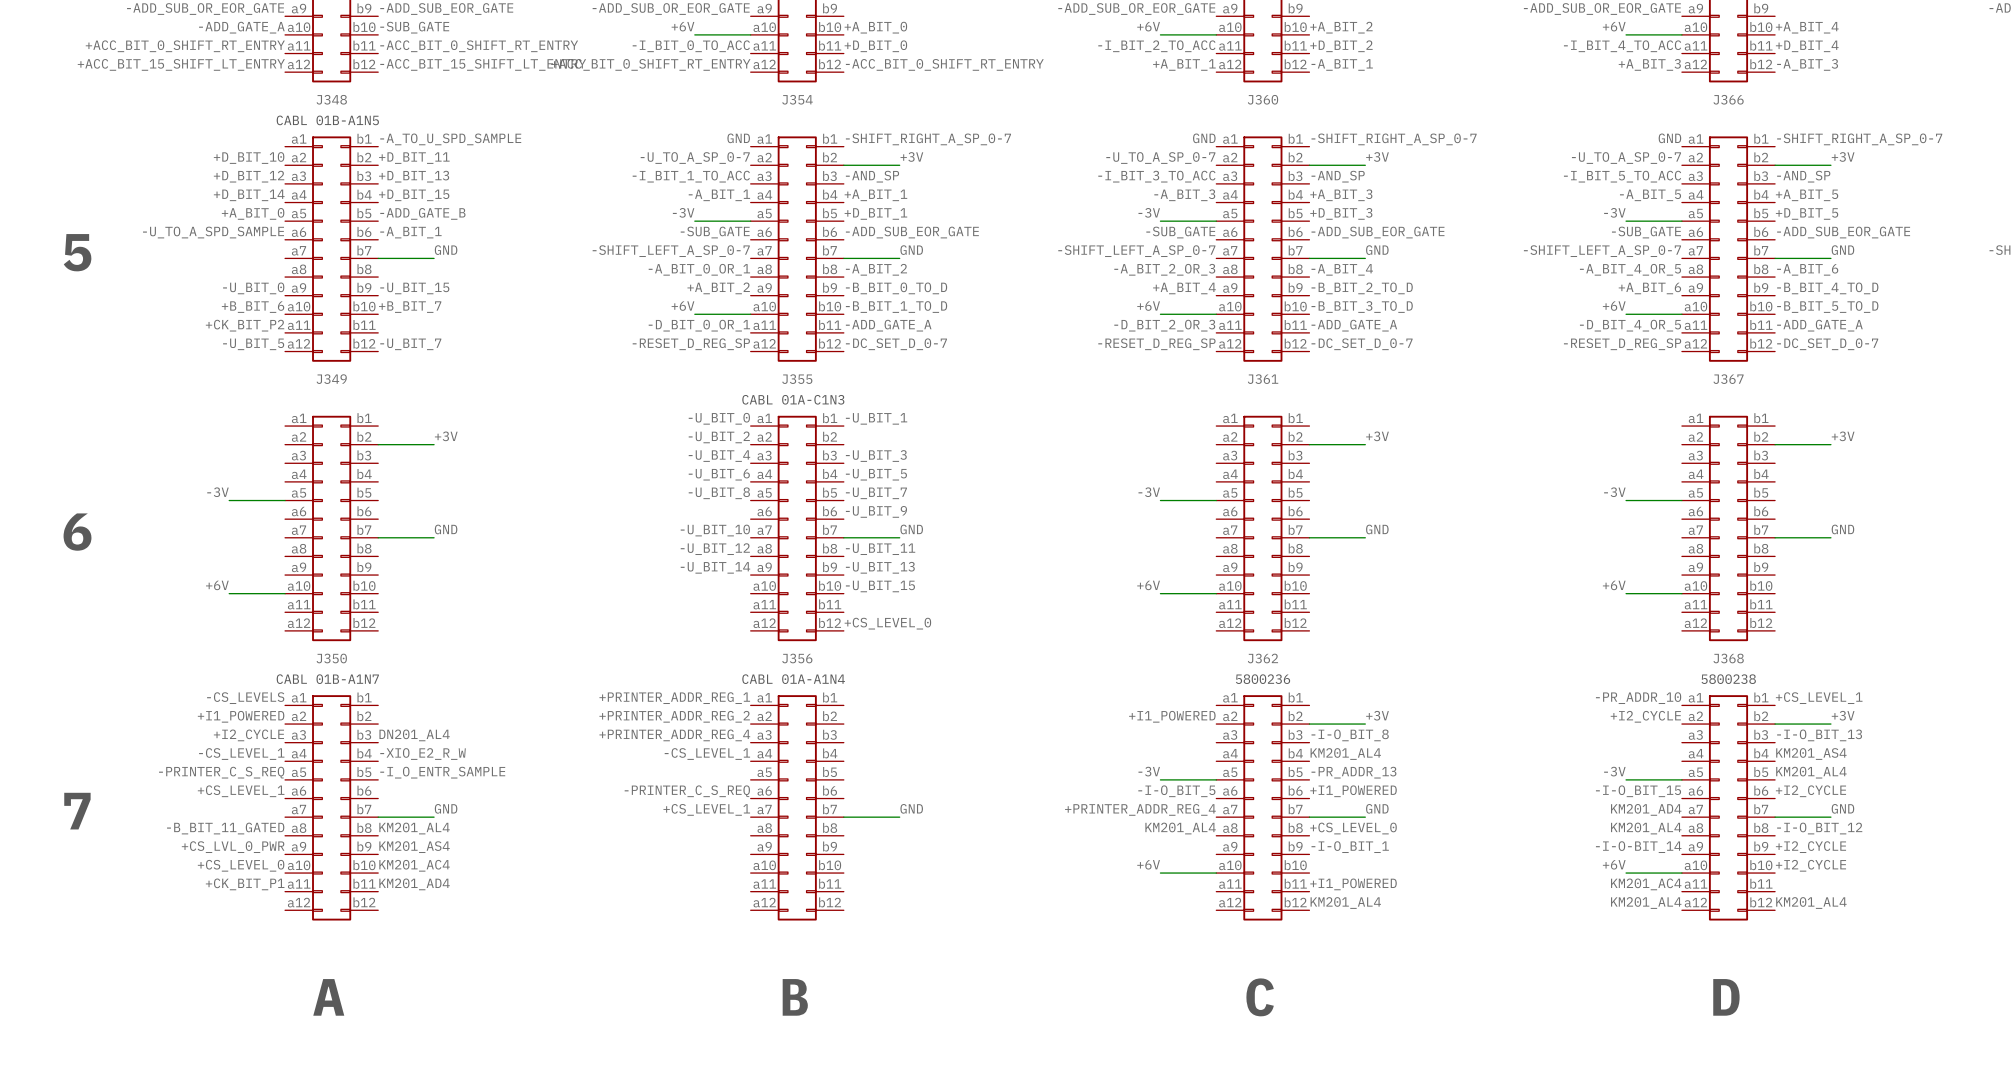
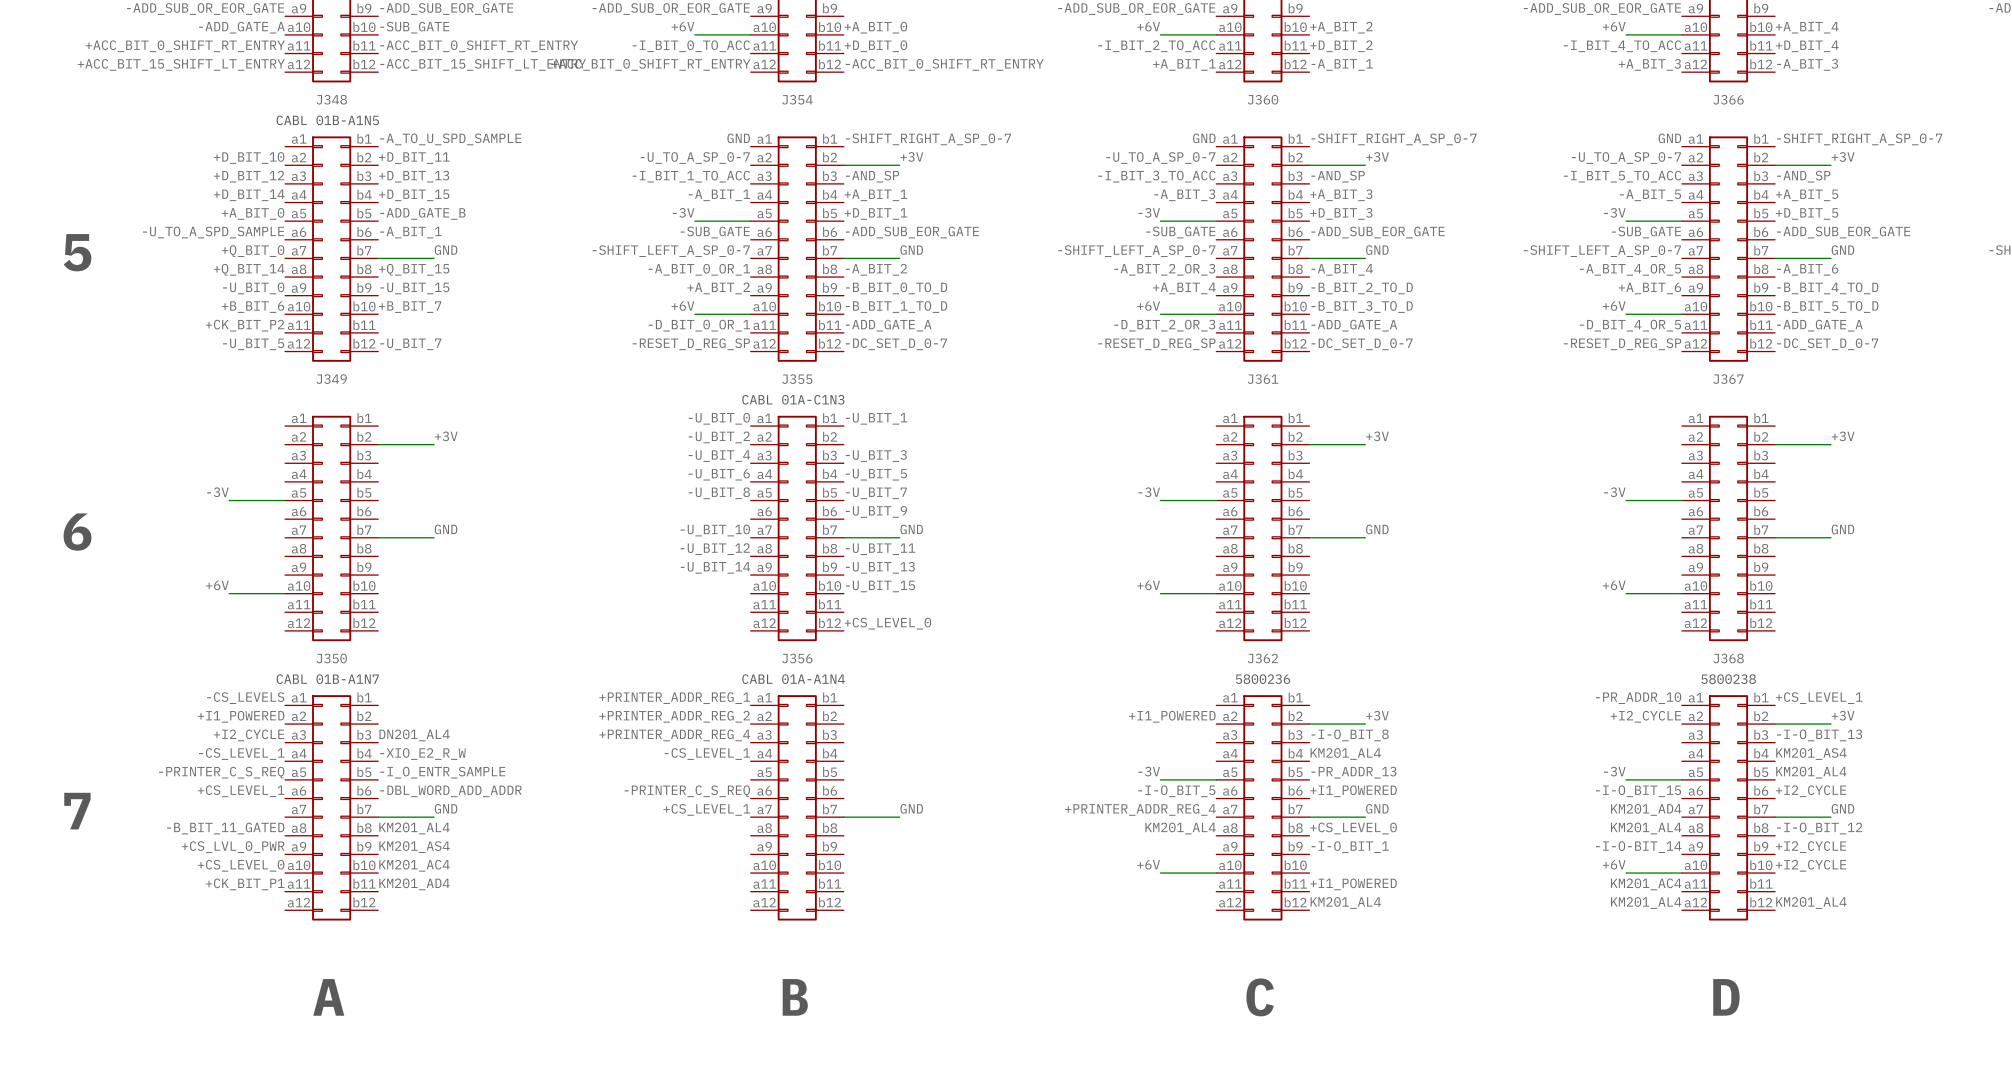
label: none -> +Q_BIT_0 (253, 251)
label: none -> +Q_BIT_14 (249, 269)
label: none -> +Q_BIT_15 (414, 269)
label: none -> -DBL_WORD_ADD_ADDR (450, 791)

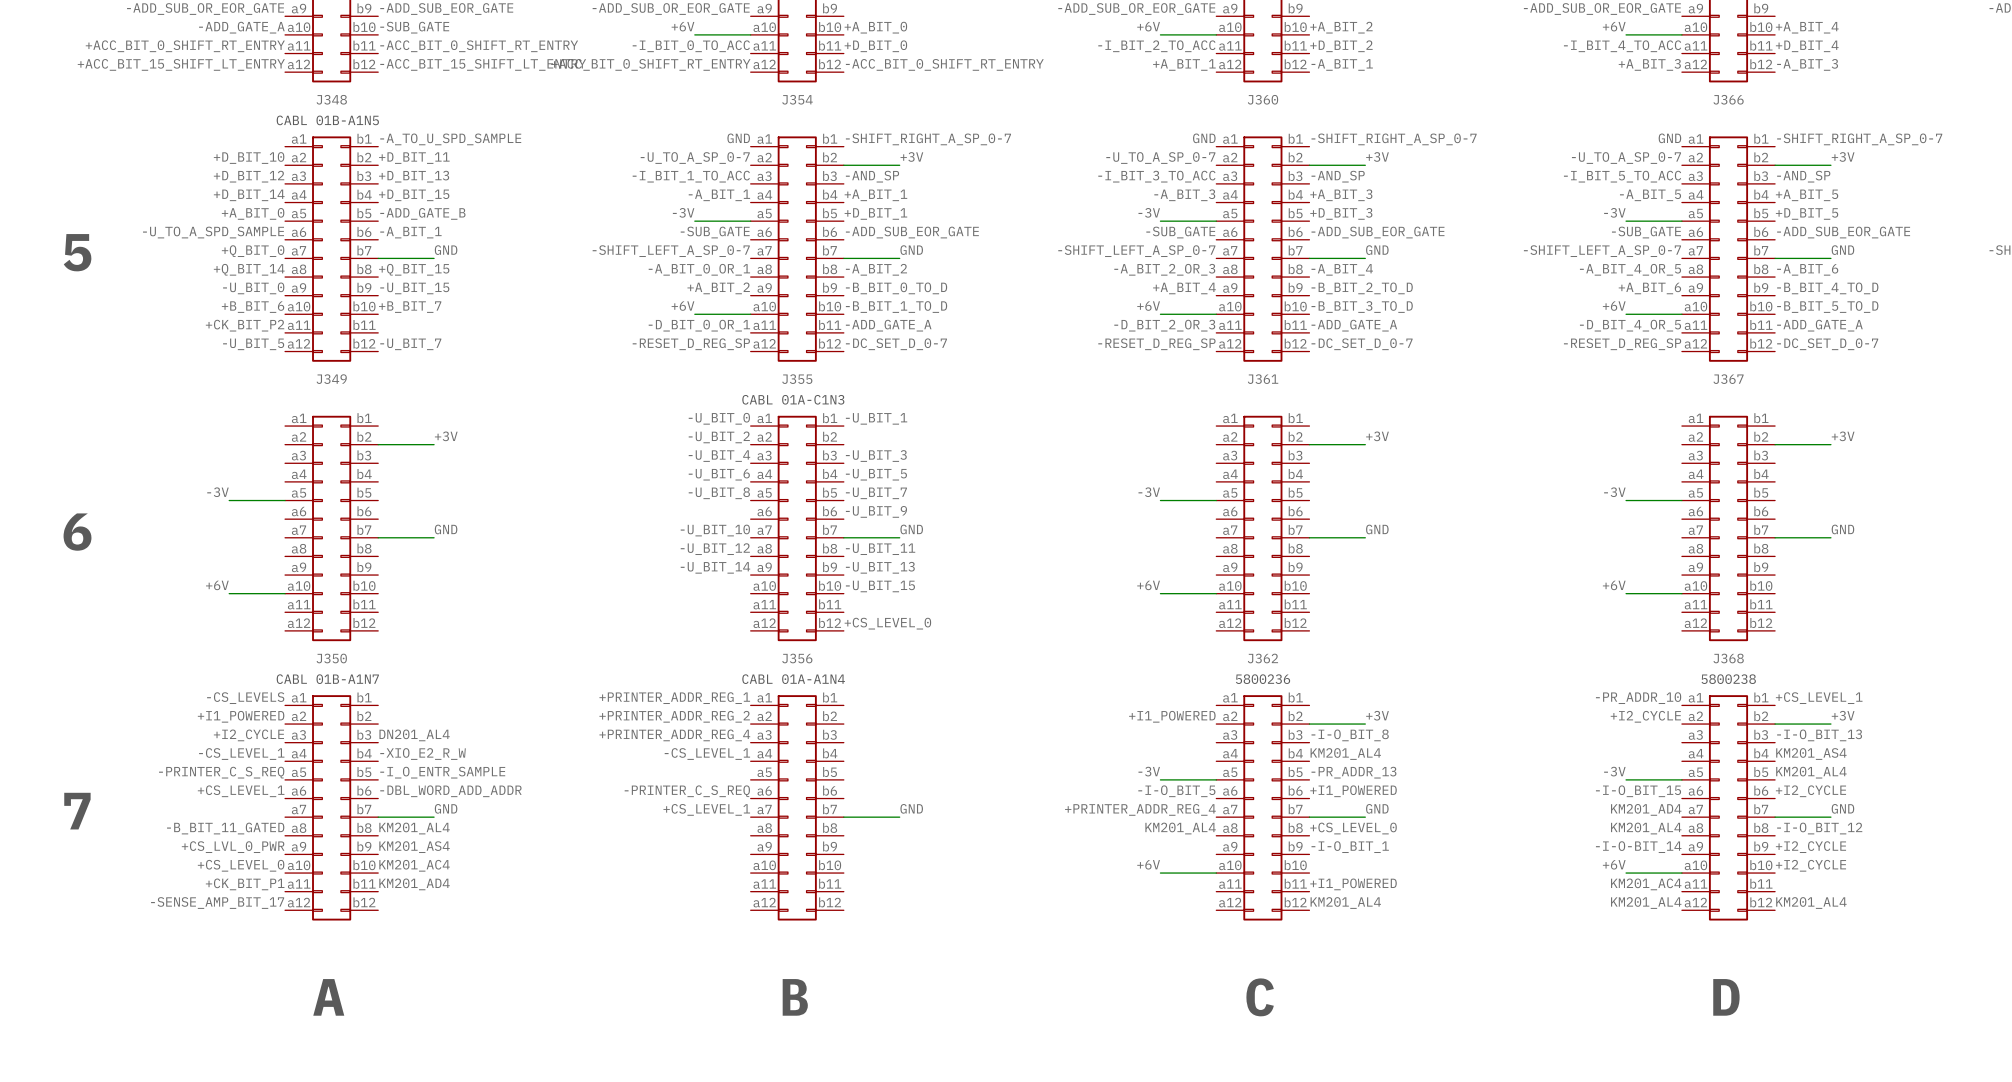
label: none -> -SENSE_AMP_BIT_17 (217, 903)

